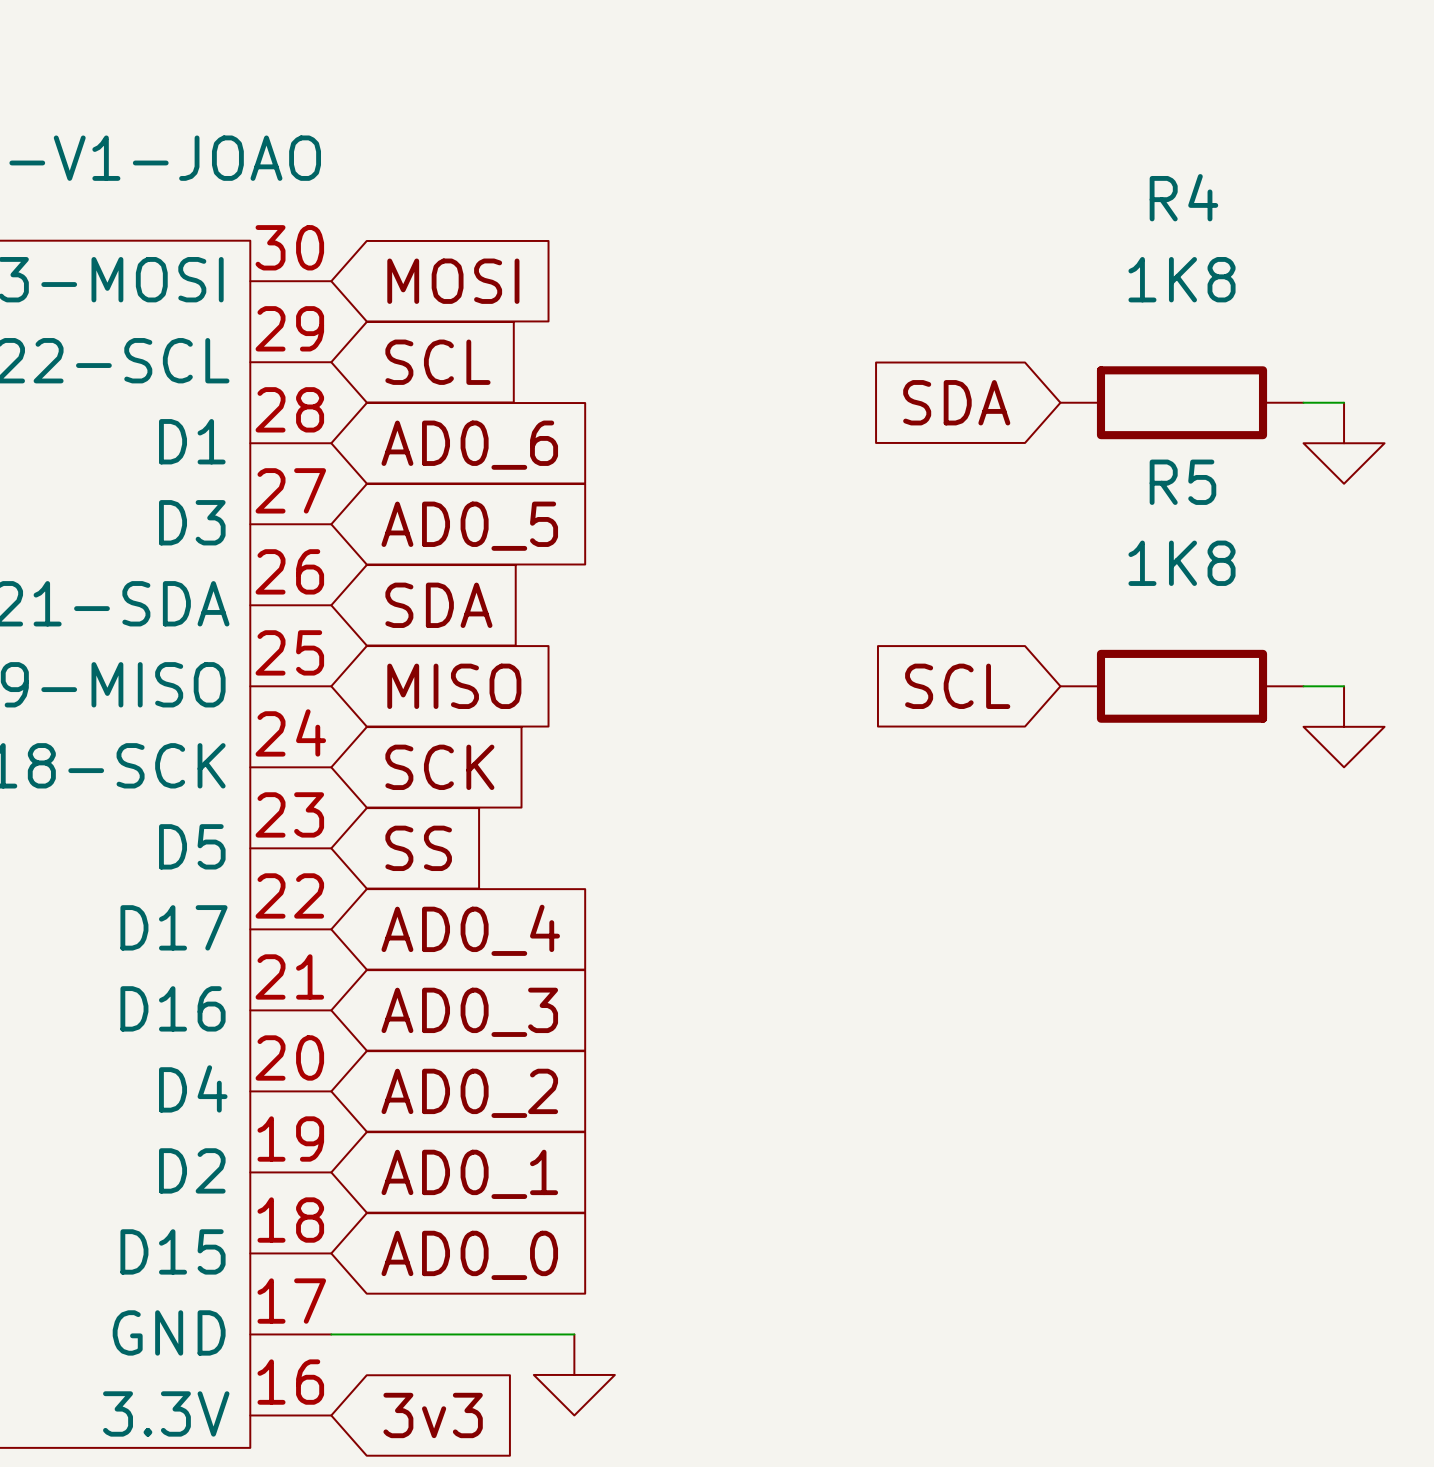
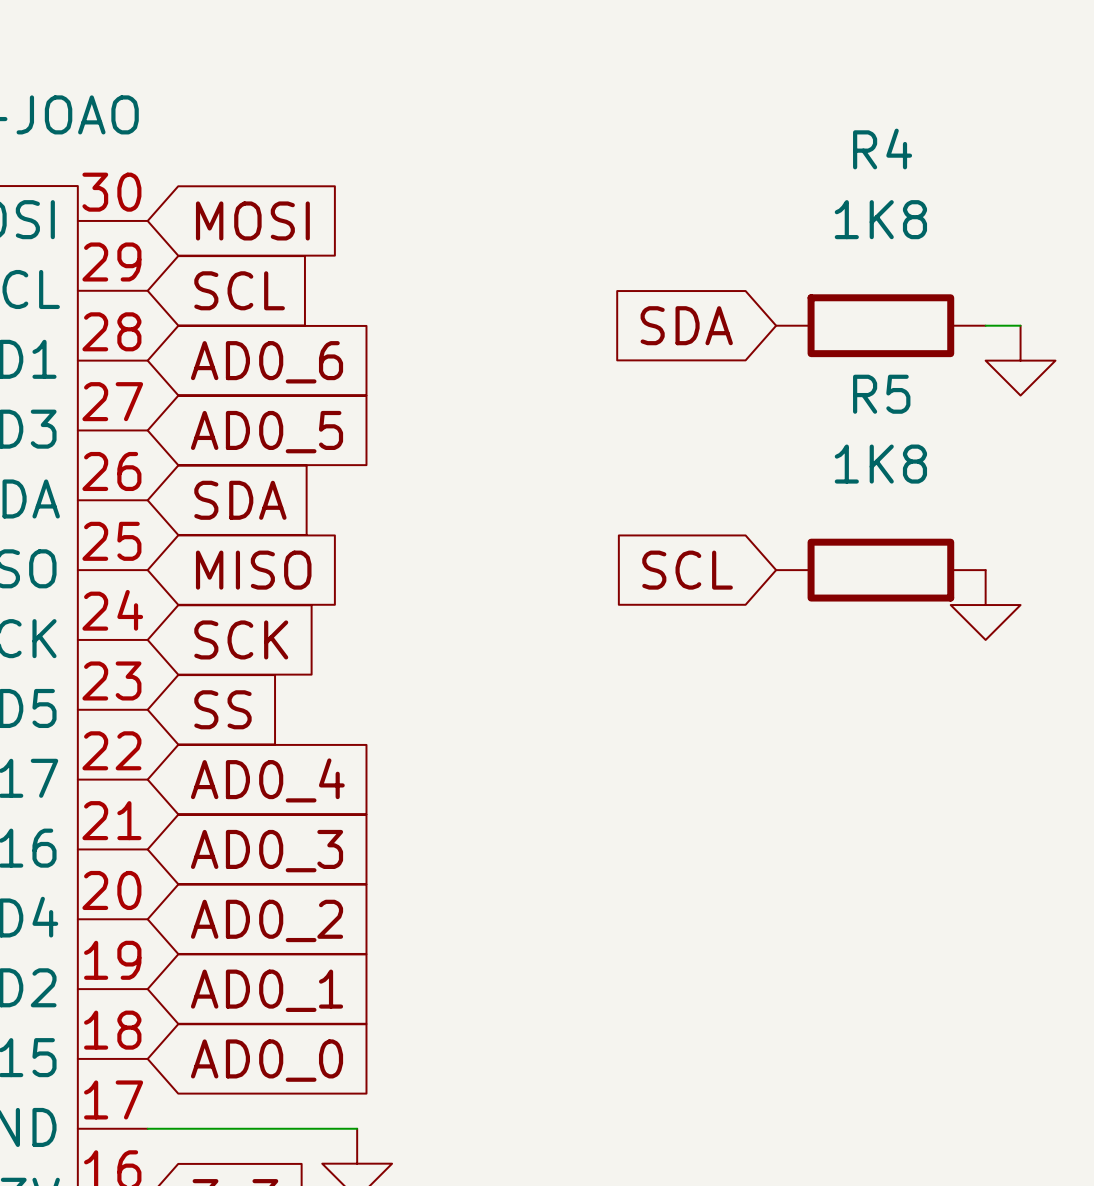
wire: (1303, 686) (1344, 686) -> none
power symbol position: (1344, 726) -> (985, 605)

